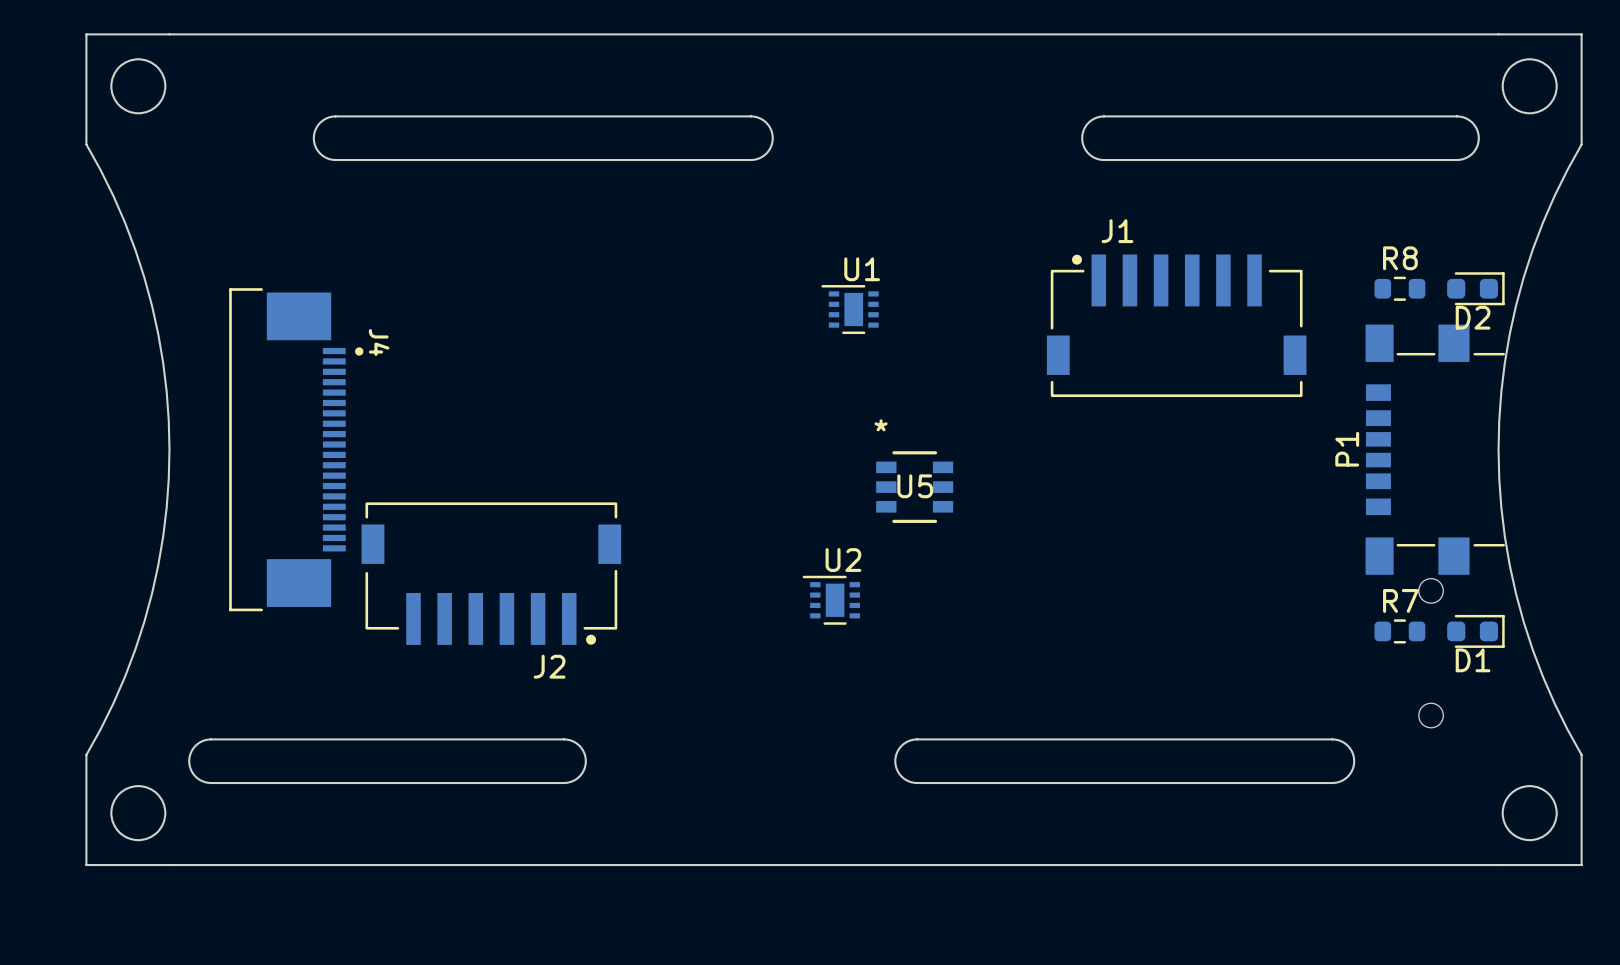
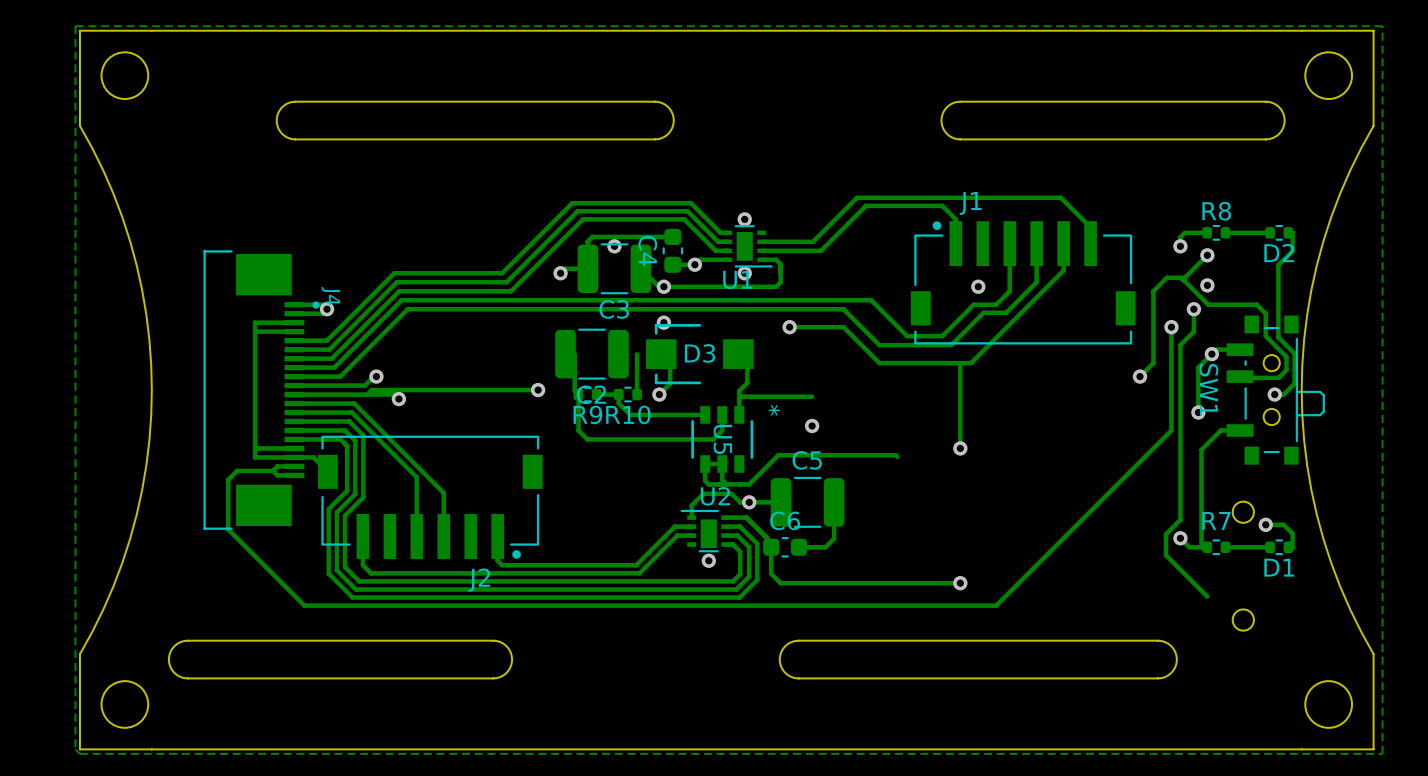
zone outline: none -> (1382, 26) (75, 26) (75, 749) (79, 753) (1382, 753) (1382, 26)
via: none -> (744, 219)
track: none -> (727, 232) (720, 232) (691, 203) (572, 203) (502, 273) (394, 273) (327, 340) (294, 340)
track: none -> (1201, 232) (1184, 232) (1180, 237) (1180, 246)
track: none -> (1265, 232) (1231, 232)
track: none -> (1293, 232) (1292, 250) (1278, 265) (1278, 337) (1294, 353) (1294, 383) (1283, 394) (1274, 394)
track: none -> (672, 236) (592, 236) (587, 241) (587, 268) (565, 268) (560, 273)
D2 footprint: [1447, 272, 1505, 306] -> [1265, 224, 1294, 241]
R8 footprint: [1374, 276, 1426, 301] -> [1202, 224, 1231, 241]
track: none -> (727, 241) (718, 241) (687, 211) (577, 211) (506, 282) (396, 282) (329, 349) (294, 349)
track: none -> (761, 241) (813, 241) (857, 197) (1060, 197) (1090, 227) (1090, 243)
track: none -> (955, 243) (955, 219) (942, 205) (866, 205) (821, 250) (761, 250)
track: none -> (1009, 243) (1009, 291) (996, 304) (973, 304) (942, 336) (907, 336) (871, 300) (401, 300) (334, 367) (294, 367)
track: none -> (1036, 243) (1036, 282) (1006, 312) (983, 312) (951, 345) (879, 345) (843, 309) (407, 309) (340, 376) (294, 376)
track: none -> (1063, 243) (1063, 270) (971, 363) (879, 363) (843, 327) (789, 327)
via: none -> (614, 246)
via: none -> (1180, 246)
C4: none -> (672, 250)
track: none -> (727, 250) (715, 250) (684, 219) (583, 219) (511, 291) (399, 291) (331, 358) (294, 358)
track: none -> (1207, 255) (1182, 280) (1208, 304) (1256, 304) (1265, 313) (1265, 336) (1286, 356) (1286, 370) (1278, 377) (1240, 376)
via: none -> (1207, 255)
track: none -> (727, 259) (699, 259) (694, 264) (672, 264)
track: none -> (761, 259) (776, 259) (780, 264) (780, 282) (776, 286) (658, 286) (640, 268)
via: none -> (694, 264)
C3: none -> (614, 268)
U1 rotation: 0° (850, 309) -> 180° (747, 246)
via: none -> (560, 273)
via: none -> (744, 273)
track: none -> (1184, 277) (1166, 277) (1153, 291) (1153, 363) (1140, 376)
via: none -> (1207, 285)
via: none -> (663, 286)
via: none -> (978, 286)
track: none -> (294, 304) (322, 304) (327, 309) (322, 313) (294, 313)
via: none -> (327, 309)
track: none -> (1193, 309) (1193, 331) (1180, 345) (1180, 519) (1166, 534) (1166, 555) (1207, 596)
via: none -> (1193, 309)
track: none -> (294, 322) (255, 322) (255, 457) (313, 457) (327, 471)
via: none -> (663, 322)
via: none -> (789, 327)
track: none -> (1171, 327) (1171, 430) (996, 605) (304, 605) (228, 529) (228, 479) (237, 470) (273, 470)
via: none -> (1171, 327)
track: none -> (294, 331) (255, 331)
track: none -> (1240, 349) (1216, 349) (1198, 367) (1198, 412)
track: none -> (574, 354) (574, 390) (578, 394) (578, 430) (587, 439) (713, 439) (722, 430) (722, 414)
C2: none -> (592, 354)
track: none -> (637, 354) (637, 394)
track: none -> (670, 354) (670, 383) (659, 394)
D3: none -> (699, 354)
track: none -> (747, 354) (747, 382) (739, 390) (739, 414)
via: none -> (1211, 354)
track: none -> (960, 363) (960, 448)
track: none -> (376, 376) (373, 376) (364, 385) (294, 385)
via: none -> (376, 376)
via: none -> (1140, 376)
track: none -> (538, 390) (371, 390) (367, 394)
via: none -> (538, 390)
P1: (1435, 449) -> none
SW1: none -> (1275, 390)
track: none -> (294, 394) (394, 394) (398, 399)
R9: none -> (587, 394)
track: none -> (596, 394) (618, 394) (618, 403) (630, 414) (705, 414)
R10: none -> (627, 394)
via: none -> (659, 394)
via: none -> (1274, 394)
track: none -> (812, 396) (741, 396) (739, 399)
via: none -> (398, 399)
track: none -> (294, 403) (354, 403) (443, 492) (443, 536)
track: none -> (294, 412) (351, 412) (416, 477) (416, 536)
via: none -> (1198, 412)
track: none -> (294, 421) (349, 421) (363, 435) (363, 497) (344, 515) (344, 567) (359, 581) (733, 581) (740, 574) (740, 551) (733, 544) (725, 544)
U5 rotation: 0° (914, 487) -> 90° clockwise (722, 439)
U5 position: (914, 487) -> (722, 439)
via: none -> (812, 425)
track: none -> (294, 430) (344, 430) (355, 440) (355, 494) (336, 512) (336, 570) (356, 589) (736, 589) (749, 576) (749, 547) (737, 535) (725, 535)
track: none -> (1240, 430) (1220, 430) (1201, 449) (1201, 547) (1189, 547) (1180, 538)
track: none -> (294, 439) (340, 439) (347, 446) (347, 490) (328, 509) (328, 573) (352, 597) (739, 597) (757, 580) (757, 543) (740, 526) (725, 526)
track: none -> (294, 448) (255, 448)
via: none -> (960, 448)
track: none -> (897, 456) (895, 455) (778, 455) (749, 484) (708, 484) (705, 480) (705, 463) (722, 463) (722, 479) (726, 484)
track: none -> (294, 466) (277, 466) (273, 470)
track: none -> (273, 470) (277, 475) (294, 475)
U2 footprint: [802, 575, 860, 625] -> [680, 509, 731, 553]
via: none -> (749, 502)
track: none -> (781, 502) (740, 502) (731, 493) (703, 493) (691, 505) (691, 517)
C5: none -> (807, 502)
track: none -> (834, 502) (834, 538) (825, 547) (799, 547)
track: none -> (725, 517) (746, 517) (771, 542) (771, 573) (780, 583) (960, 583)
track: none -> (1265, 524) (1283, 524) (1292, 533) (1293, 547)
via: none -> (1265, 524)
track: none -> (691, 526) (674, 526) (636, 565) (502, 565) (497, 560) (497, 536)
D1 footprint: [1447, 614, 1505, 648] -> [1265, 539, 1294, 556]
track: none -> (691, 535) (677, 535) (639, 573) (371, 573) (362, 565) (362, 536)
R7 footprint: [1374, 619, 1426, 644] -> [1202, 539, 1231, 556]
via: none -> (1180, 538)
C6: none -> (785, 547)
track: none -> (1265, 547) (1231, 547)
via: none -> (708, 560)
via: none -> (960, 583)

